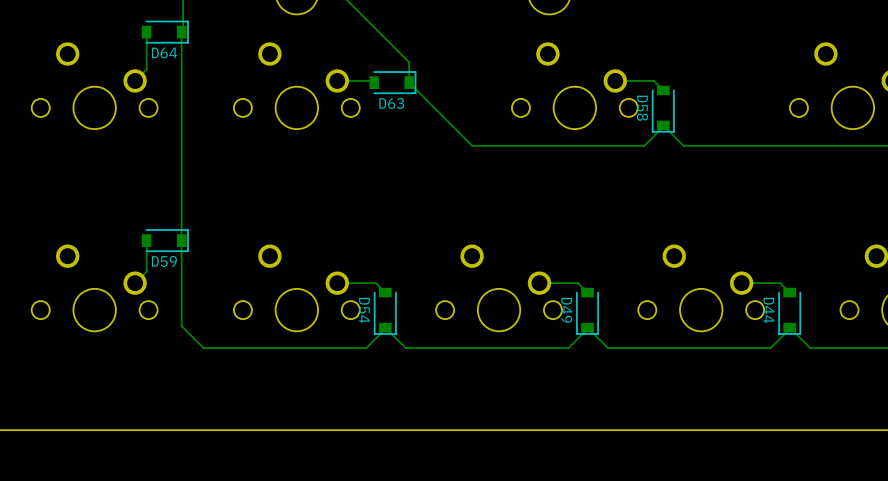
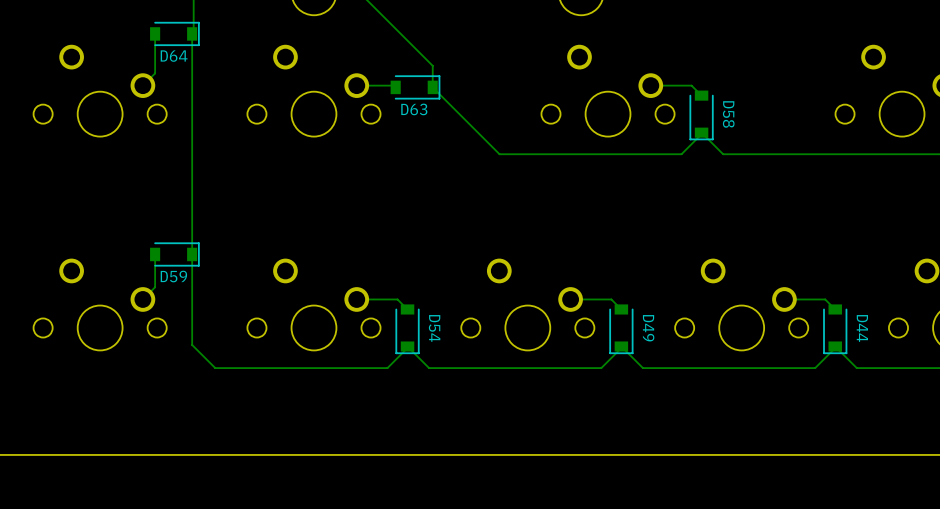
D58 name position: D58 (642, 108) -> D58 (728, 114)
D54 name position: D54 (364, 310) -> D54 (434, 328)
D49 name position: D49 (566, 310) -> D49 (648, 328)
D44 name position: D44 (768, 310) -> D44 (862, 328)

